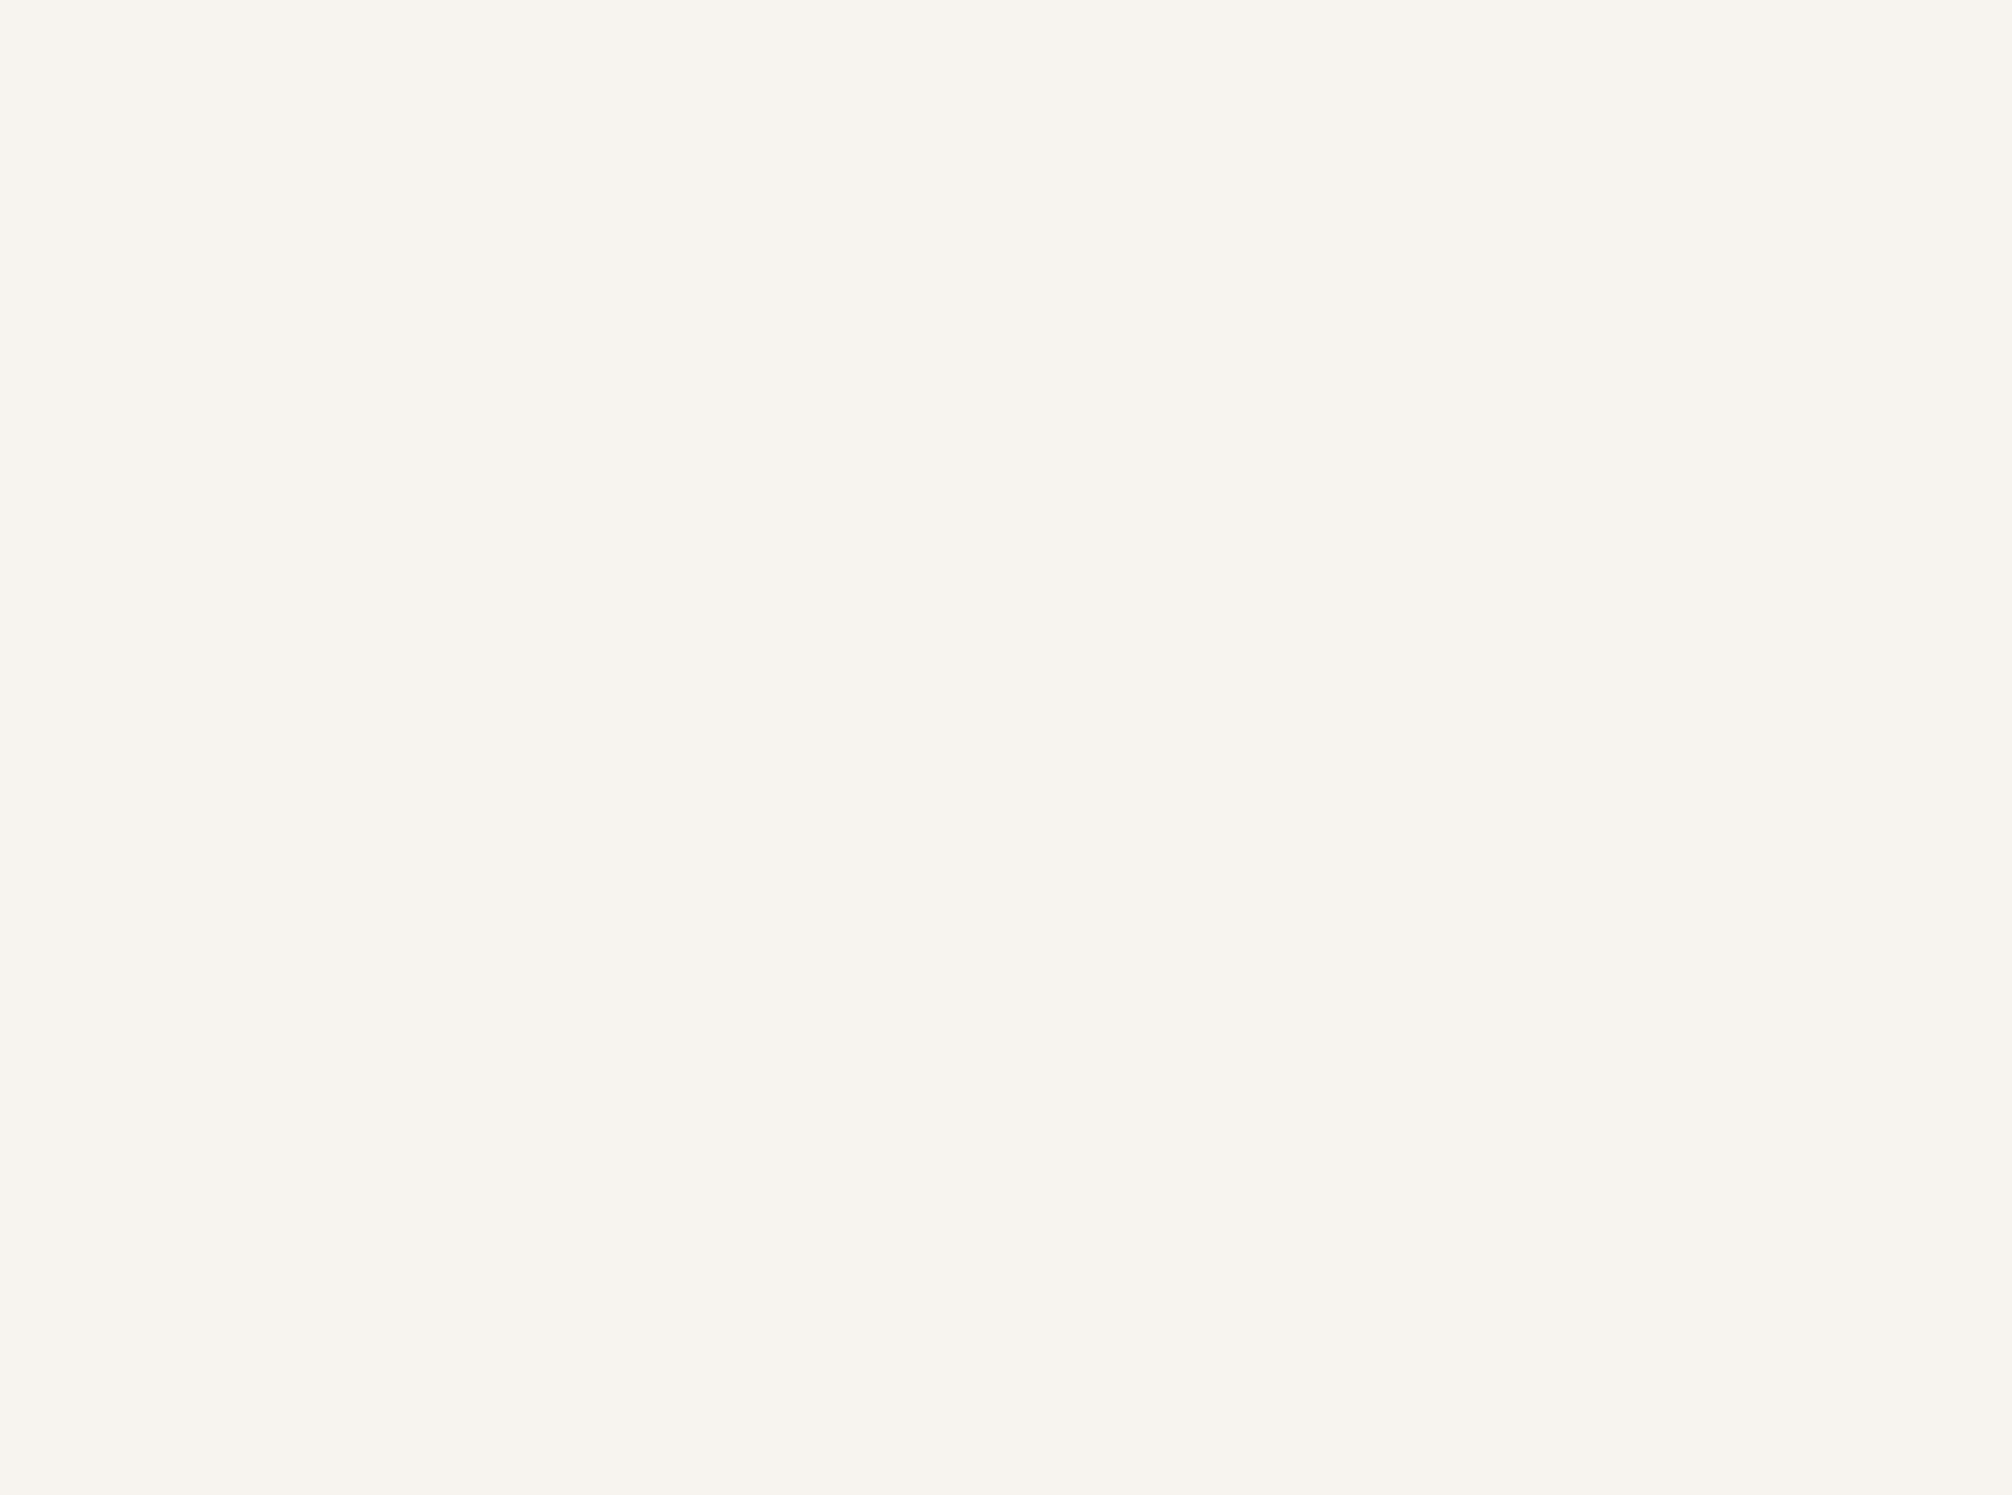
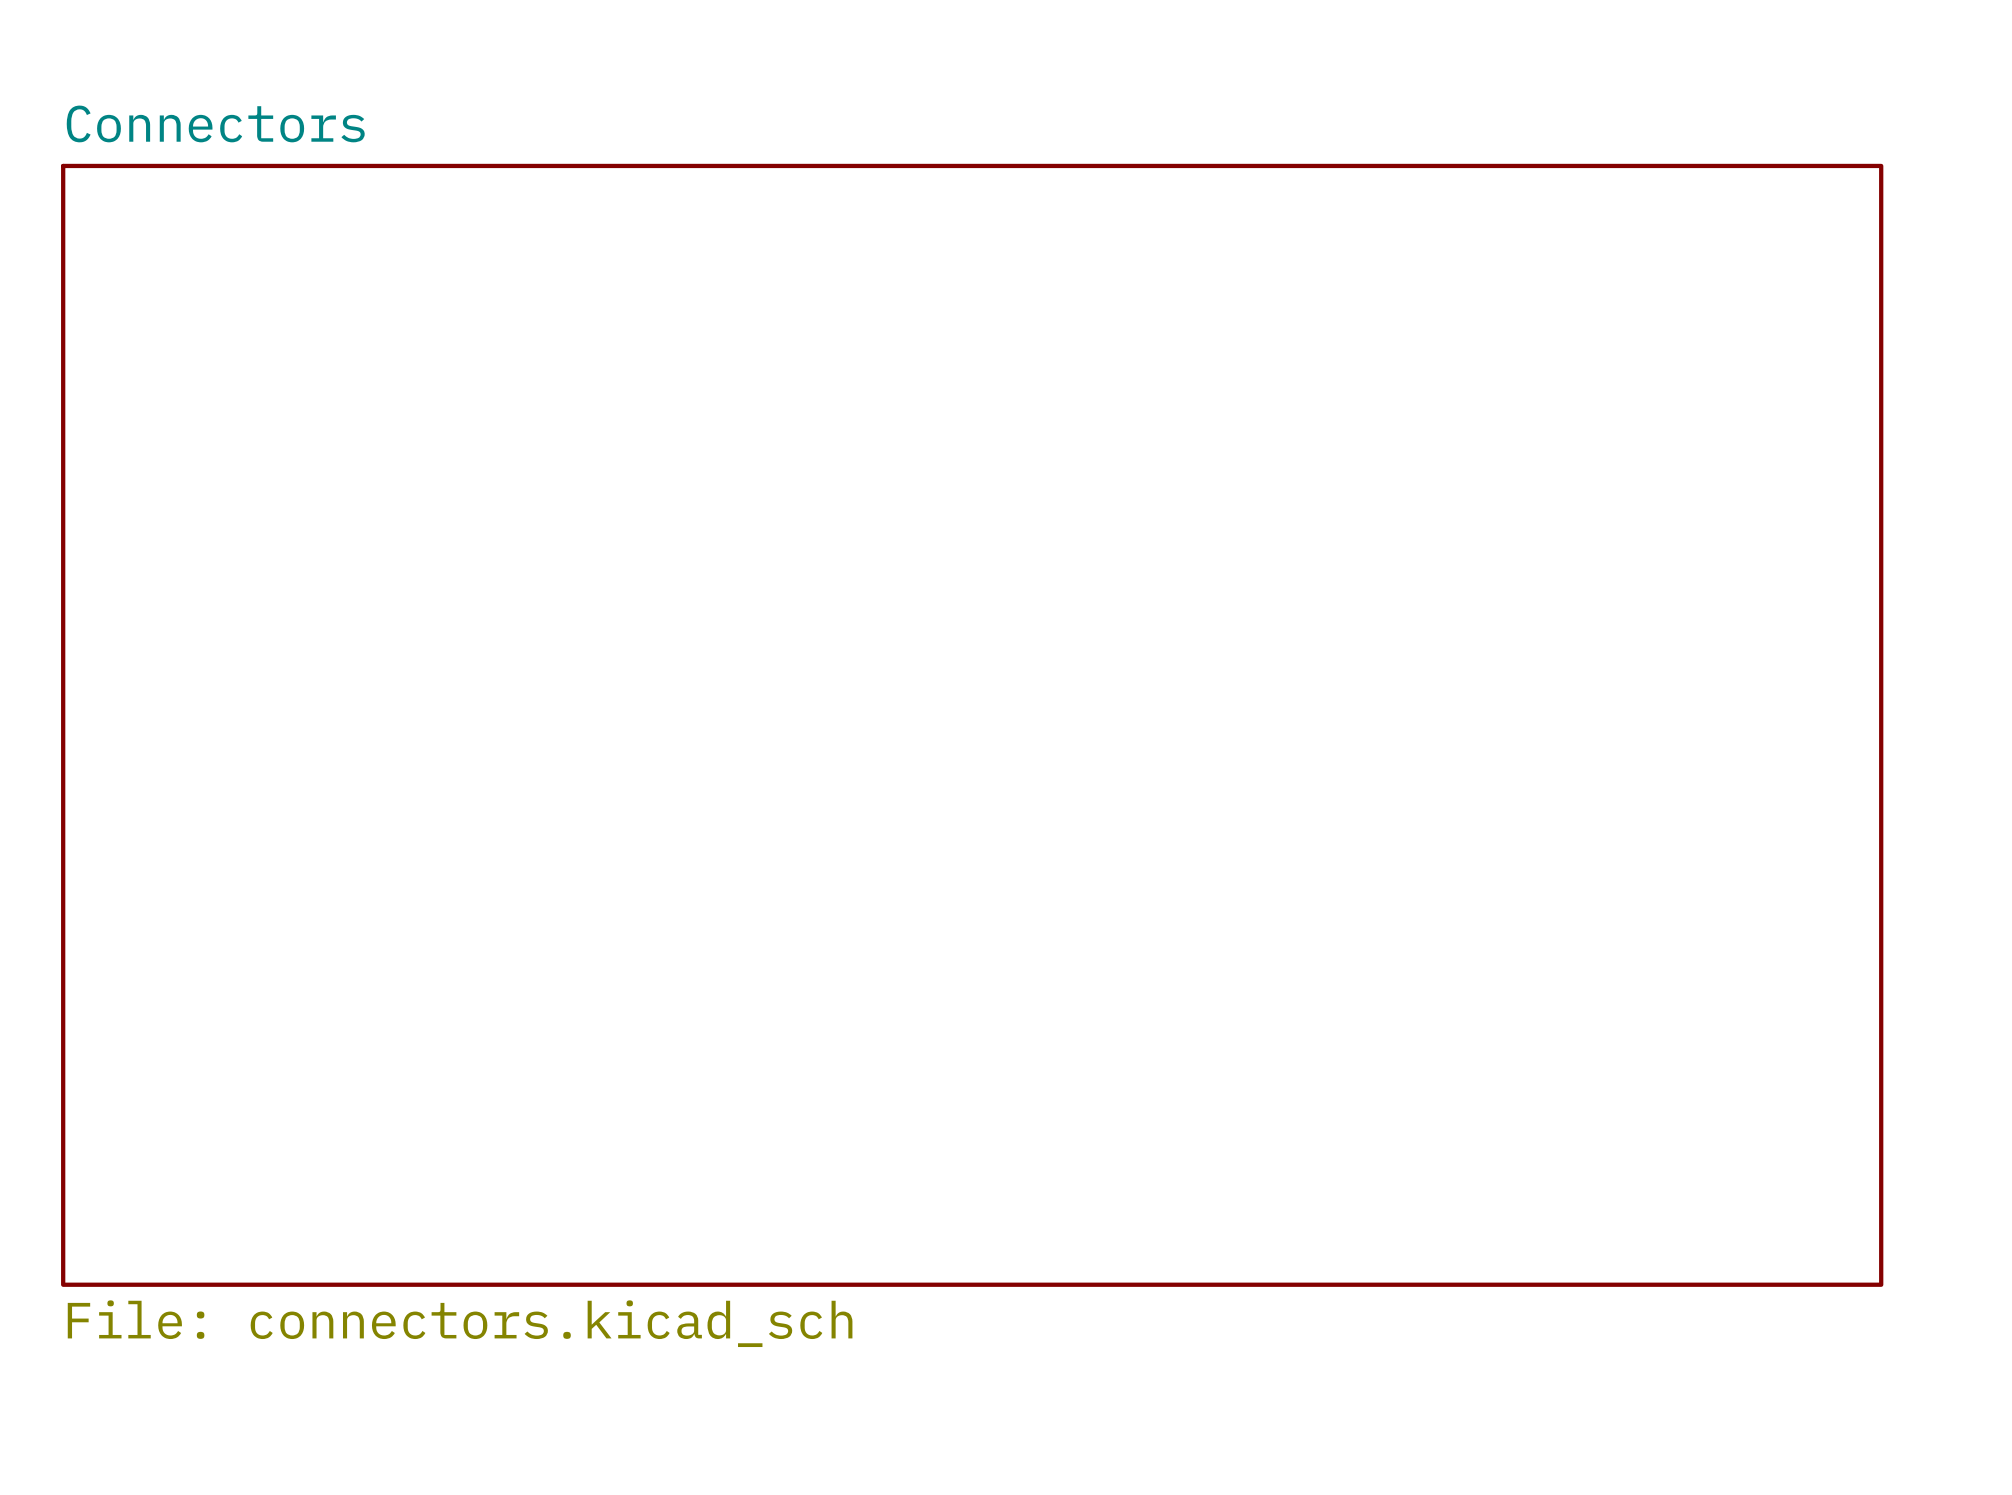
sheet Connectors: none -> File: connectors.kicad_sch (972, 725)

